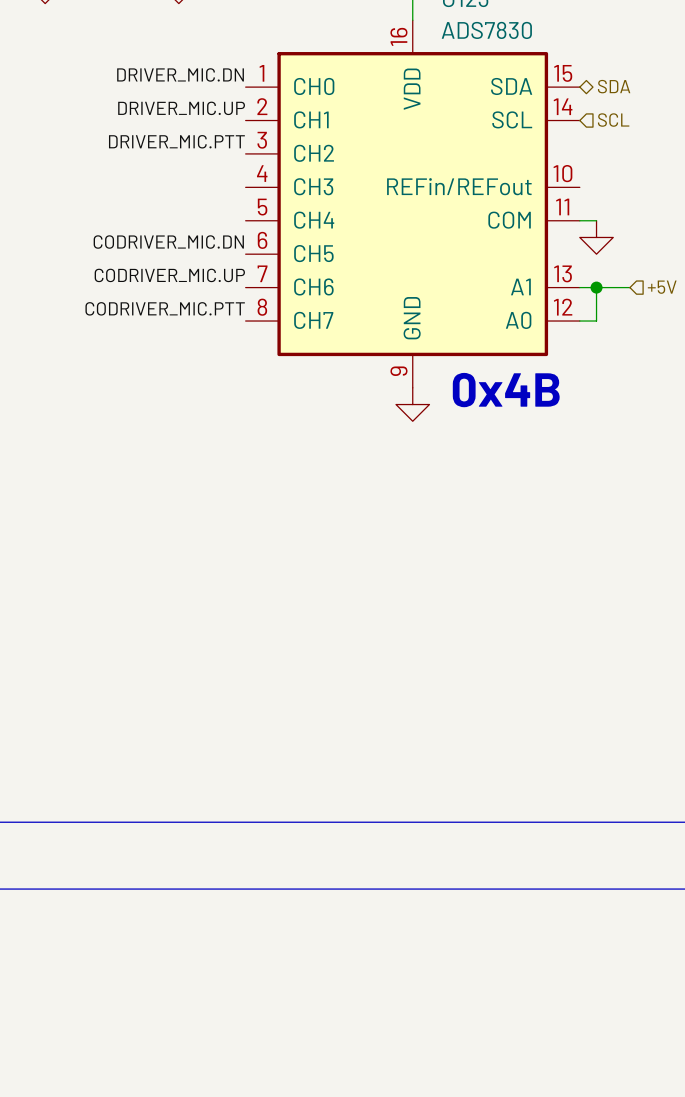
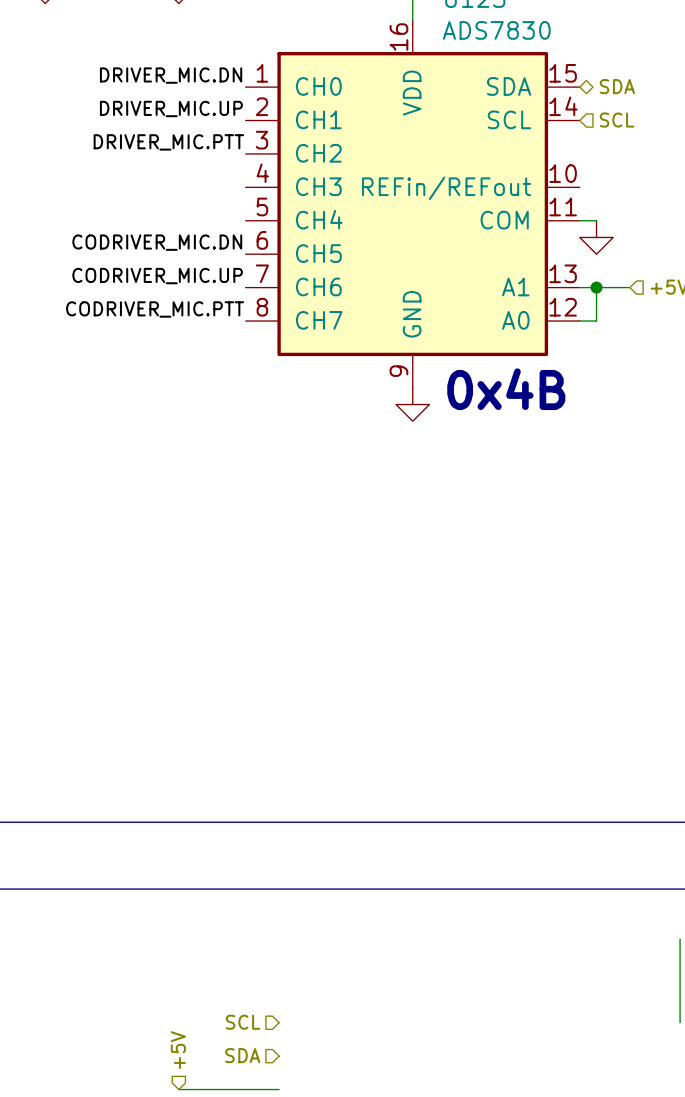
wire: none -> (680, 939) (680, 1022)
hierarchical label: none -> SCL (243, 1022)
hierarchical label: none -> SDA (242, 1055)
hierarchical label: none -> +5V (178, 1050)
wire: none -> (178, 1089) (279, 1089)

